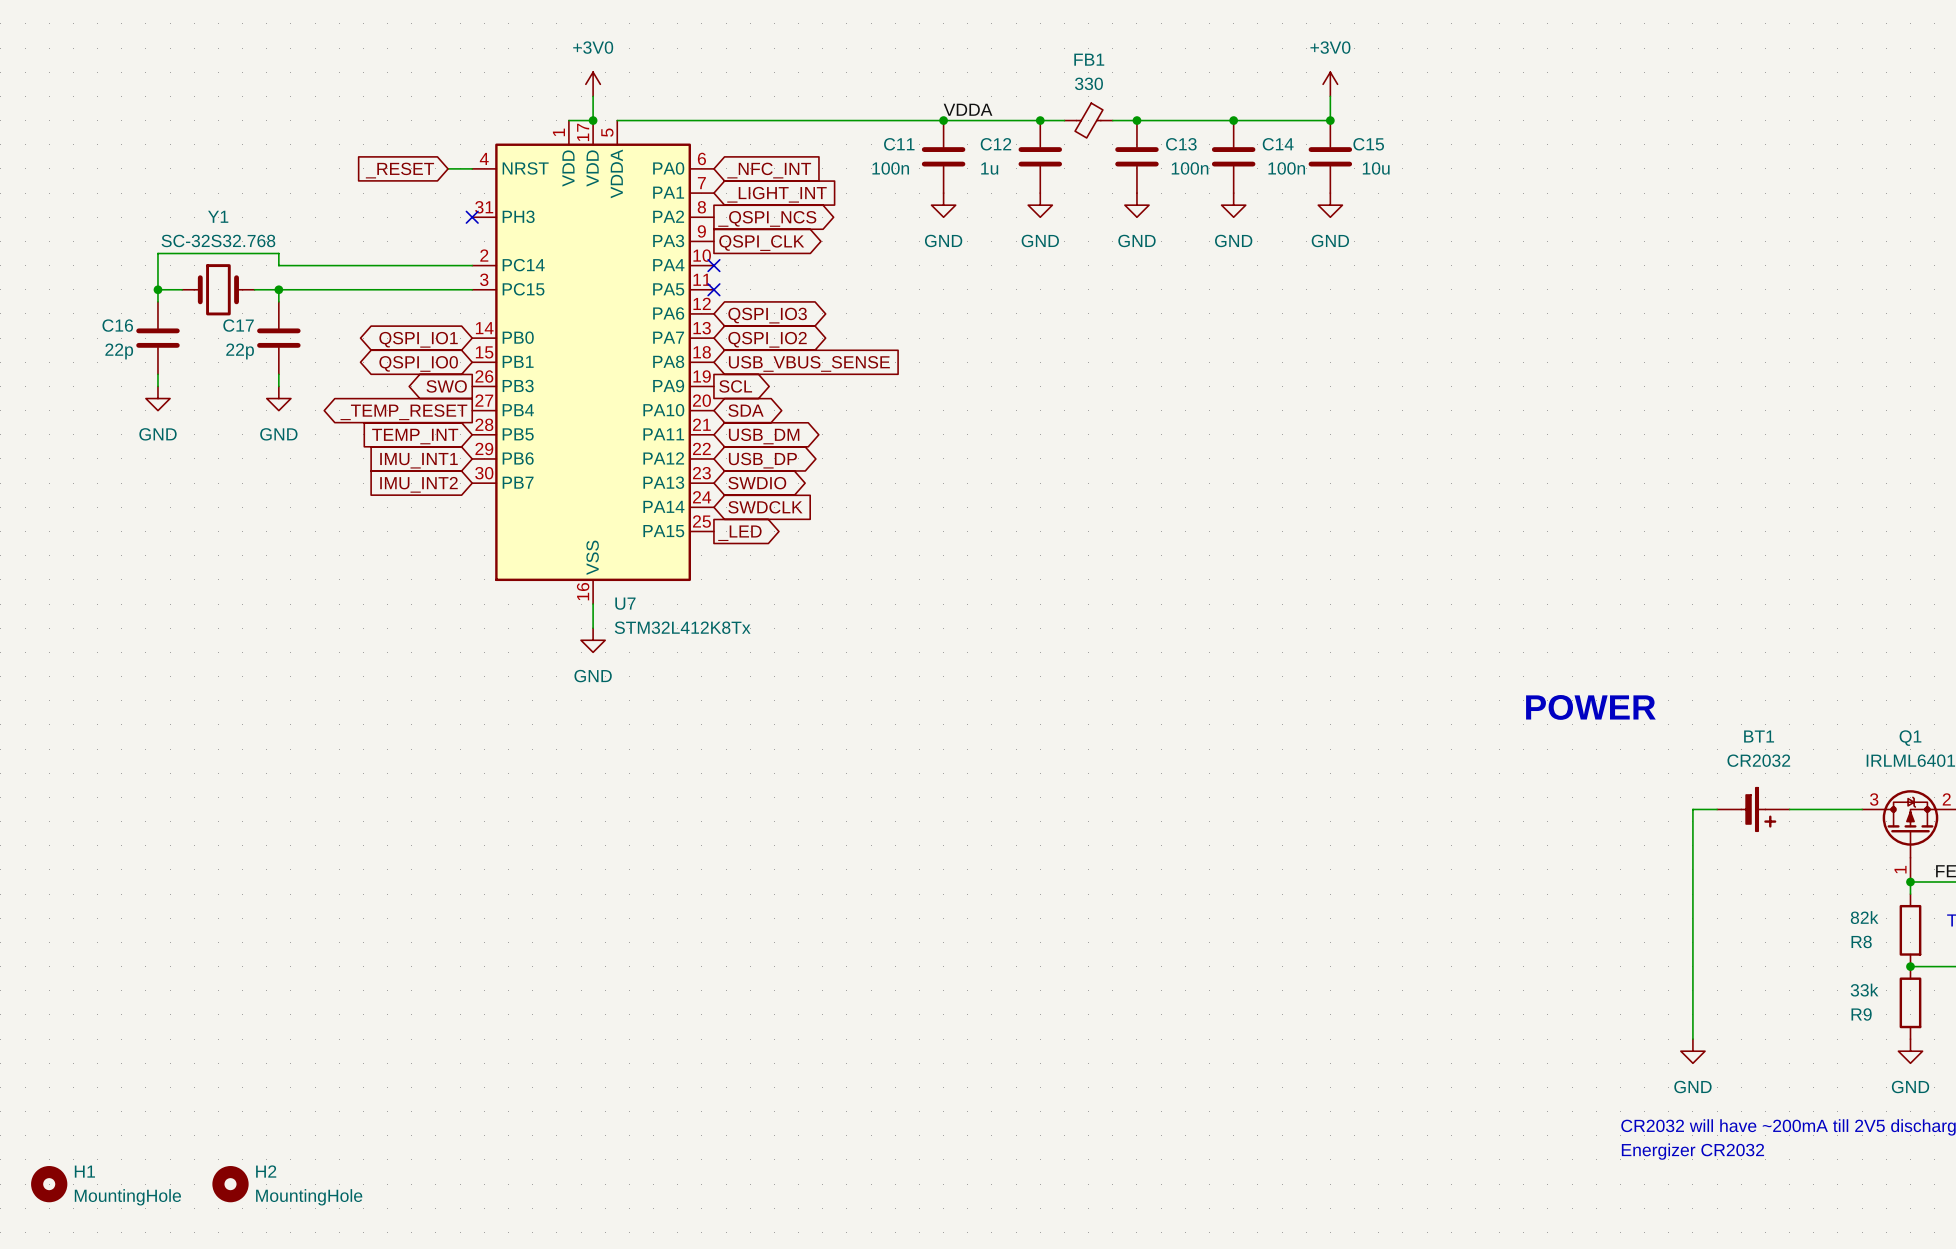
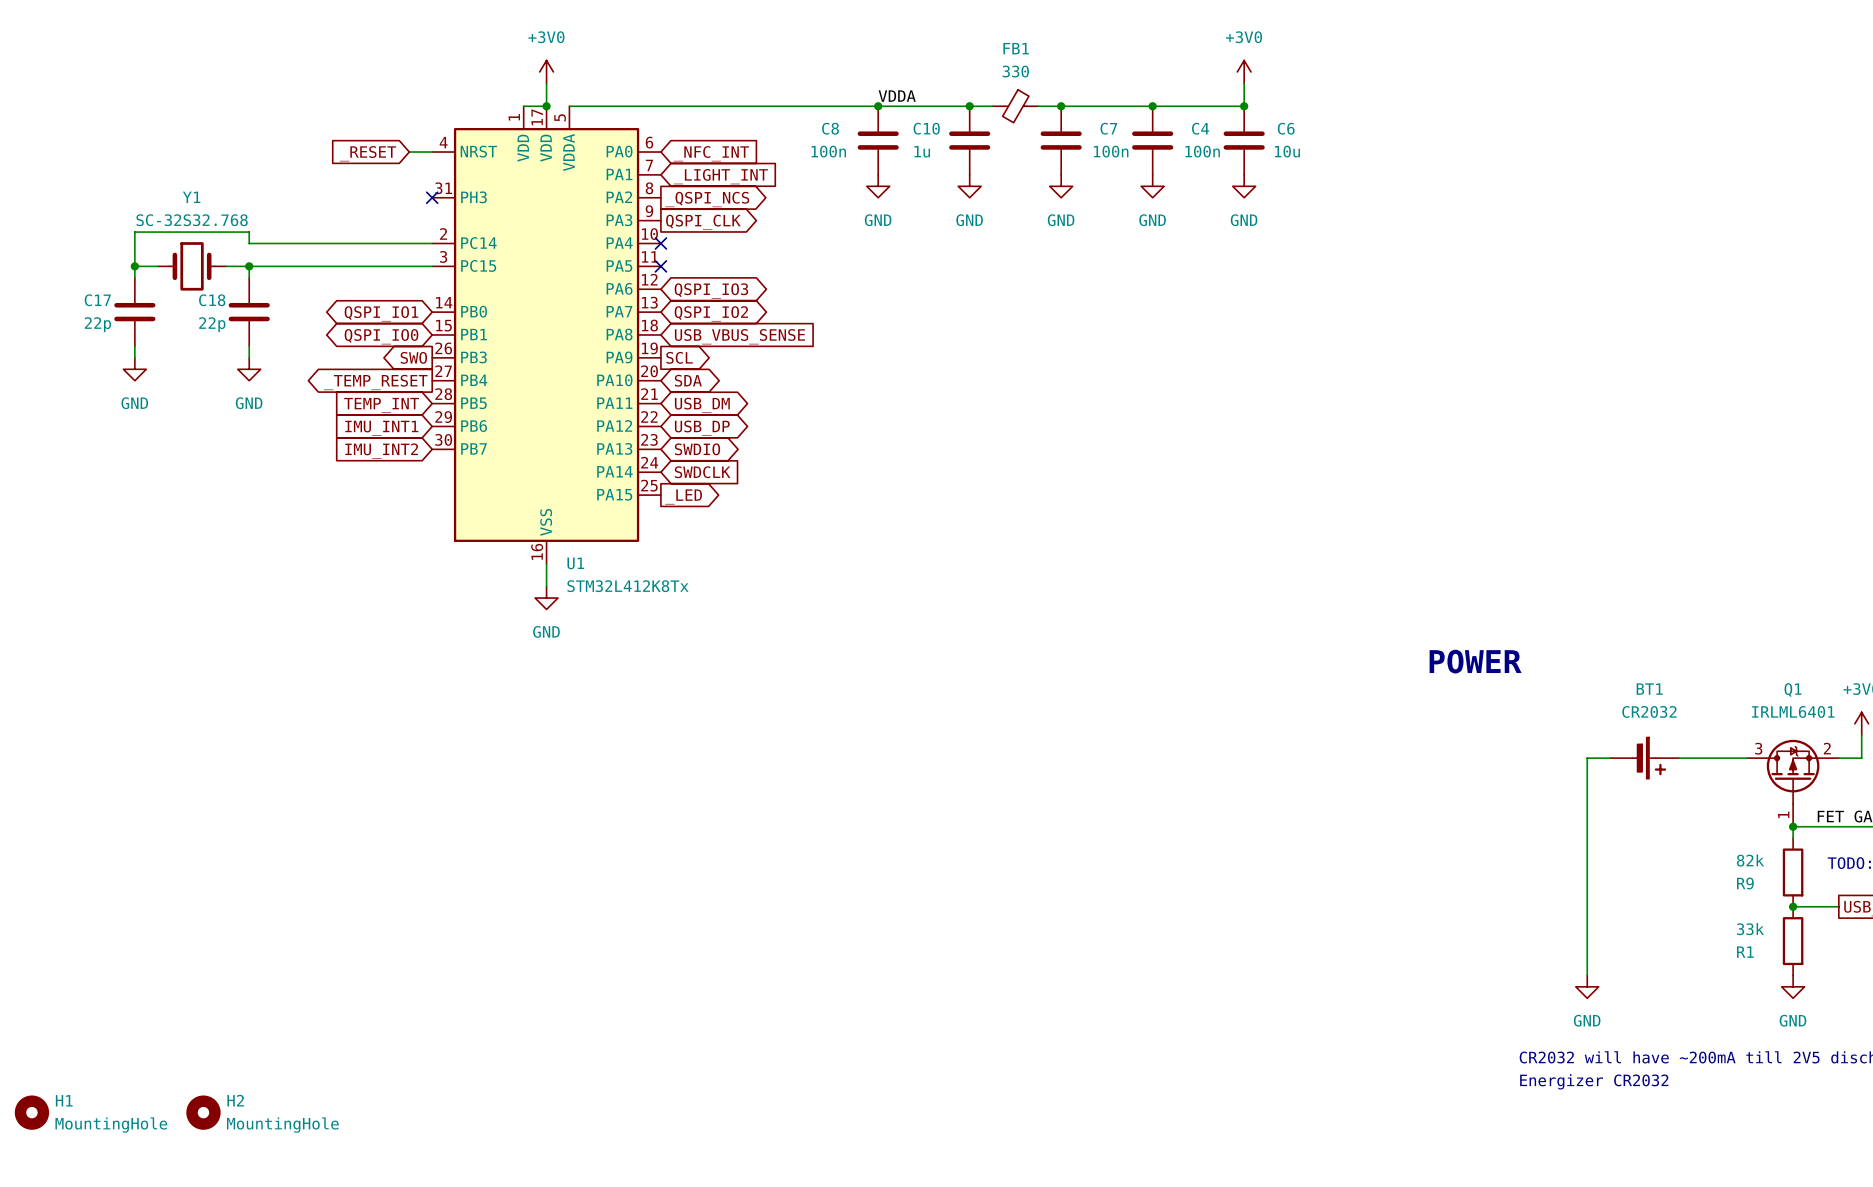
C11 name: C11 (899, 144) -> C8 (830, 128)
C12 name: C12 (995, 144) -> C10 (926, 128)
C13 name: C13 (1181, 144) -> C7 (1108, 128)
C14 name: C14 (1278, 144) -> C4 (1200, 128)
C15 name: C15 (1368, 144) -> C6 (1286, 128)
C16 name: C16 (117, 325) -> C17 (97, 300)
C17 name: C17 (238, 325) -> C18 (212, 300)
U7 name: U7 (625, 603) -> U1 (575, 563)
R8 name: R8 (1861, 941) -> R9 (1745, 883)
R9 name: R9 (1861, 1014) -> R1 (1745, 952)

